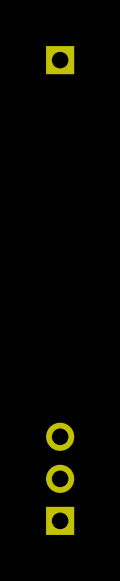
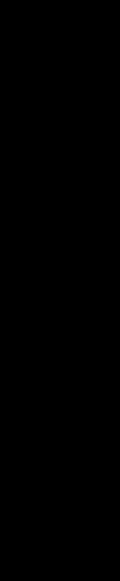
part: (60, 60) -> none
part: (60, 478) -> none

